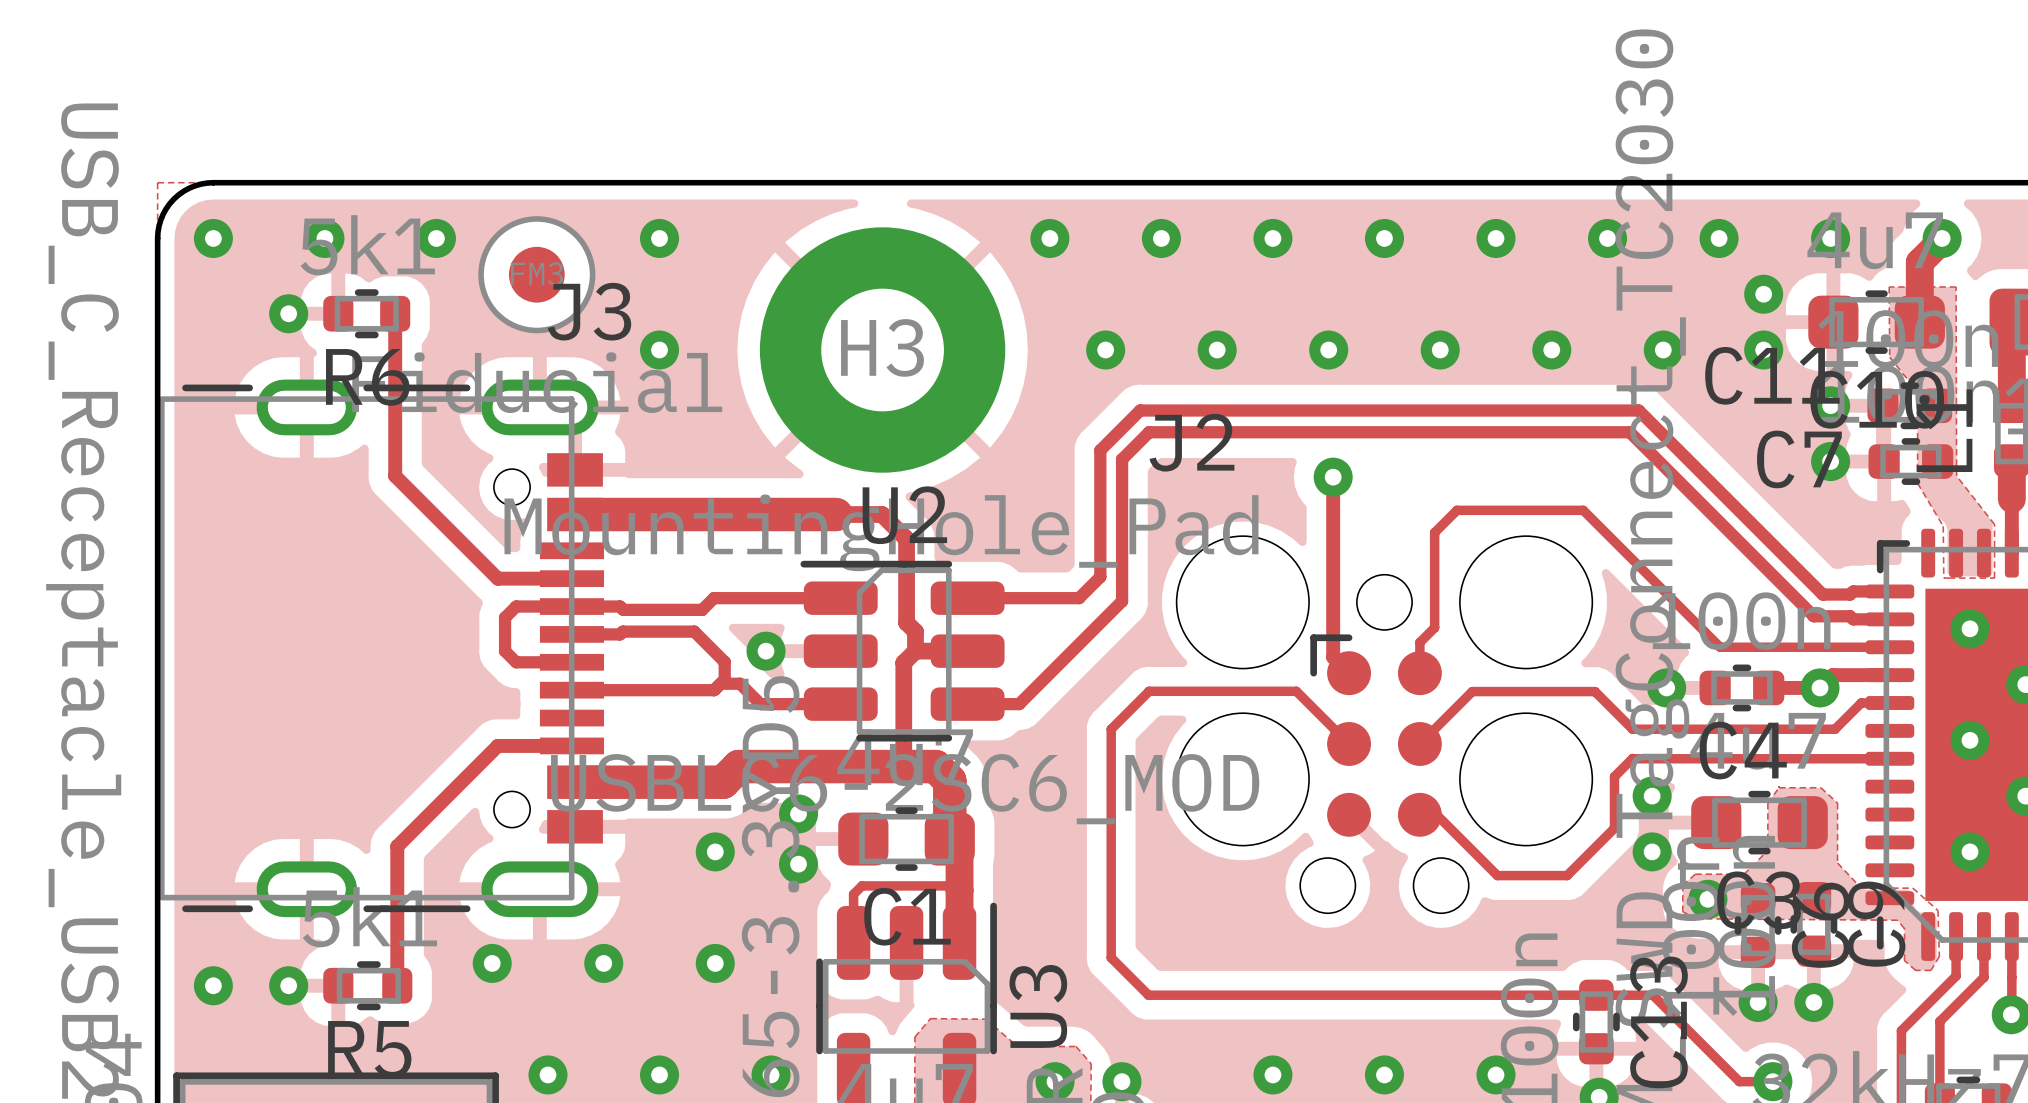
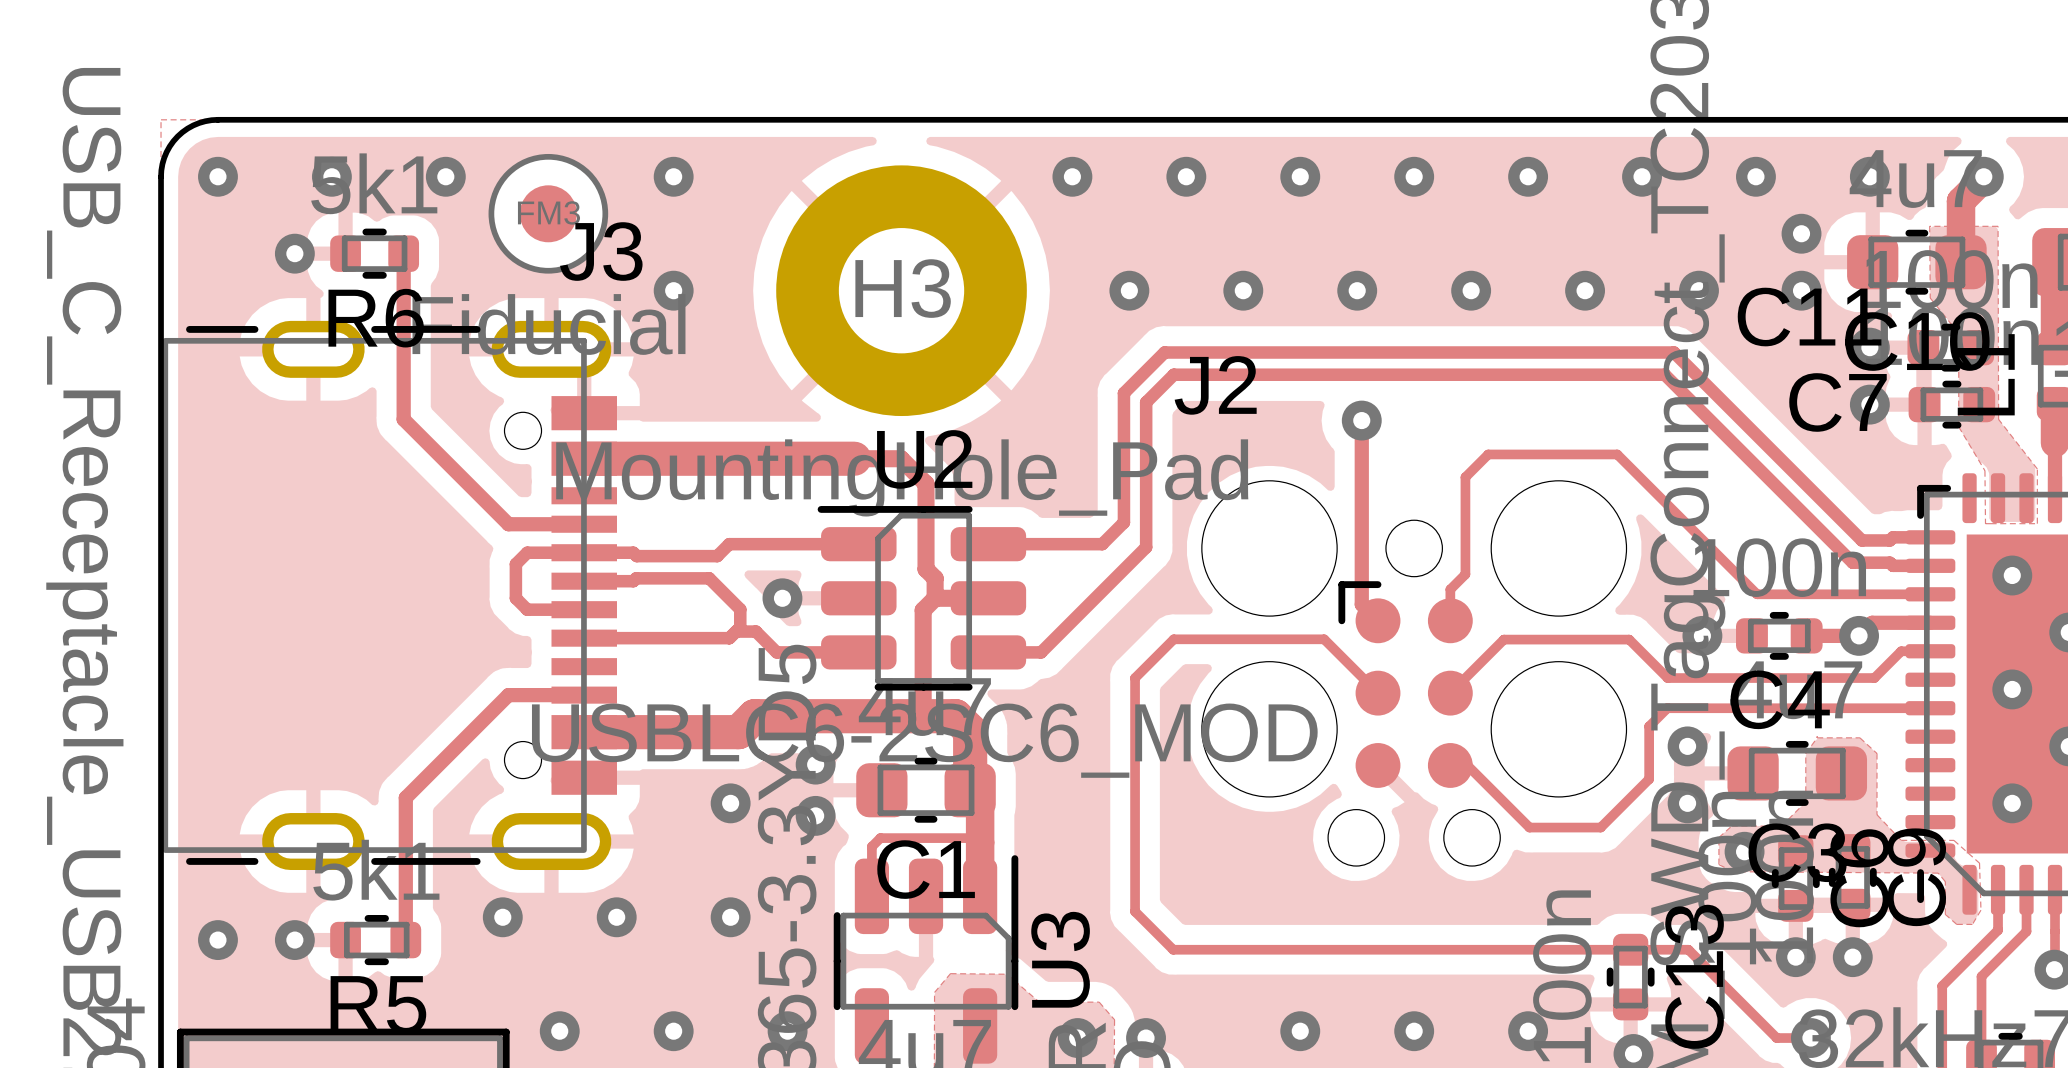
J3 footprint: [159, 379, 605, 918] -> [162, 320, 617, 871]

